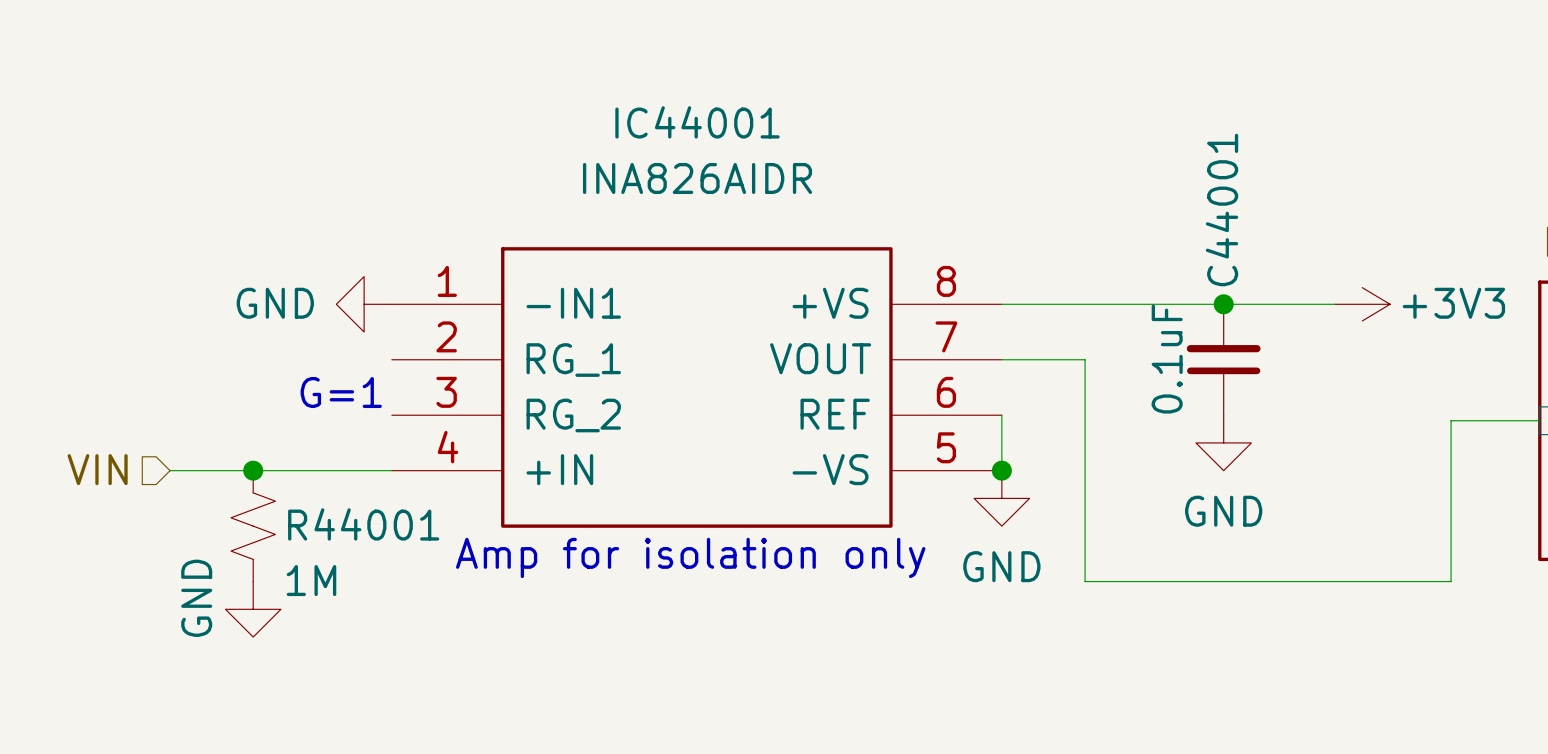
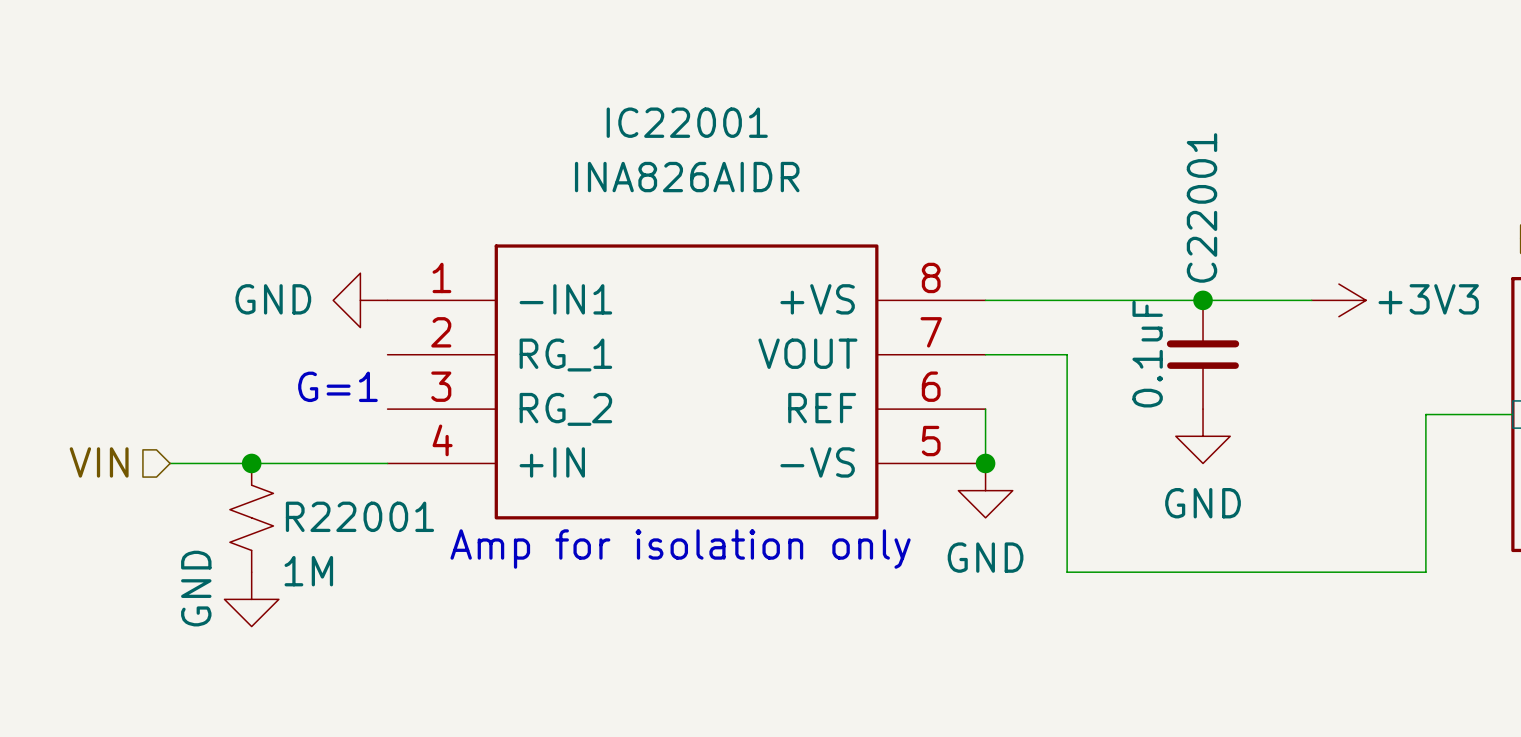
IC44001 name: IC44001 (697, 122) -> IC22001 (687, 122)
C44001 name: C44001 (1221, 210) -> C22001 (1202, 207)
R44001 name: R44001 (363, 524) -> R22001 (359, 516)

